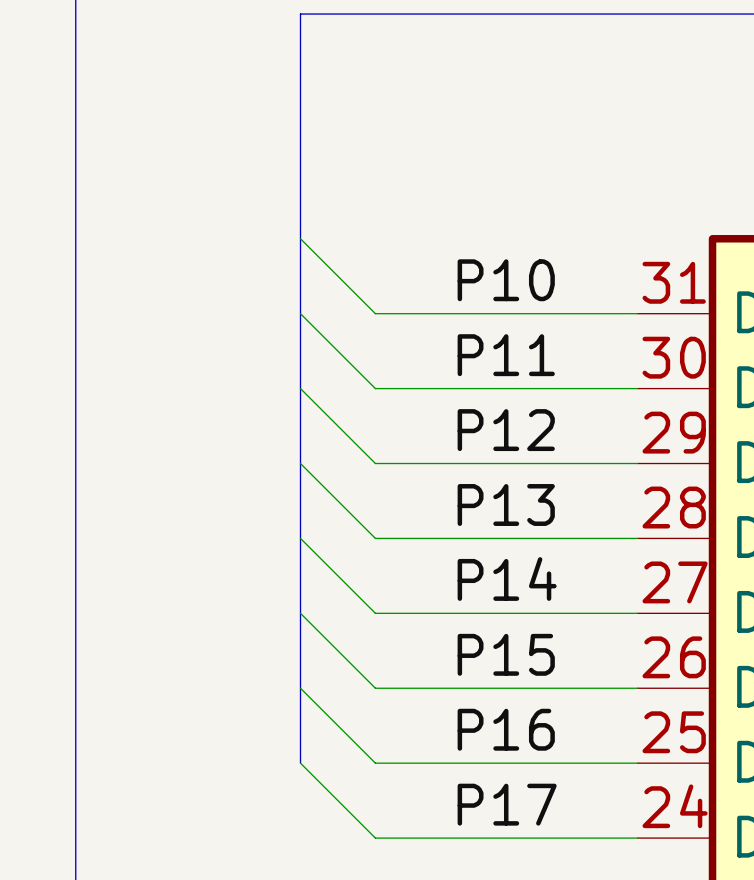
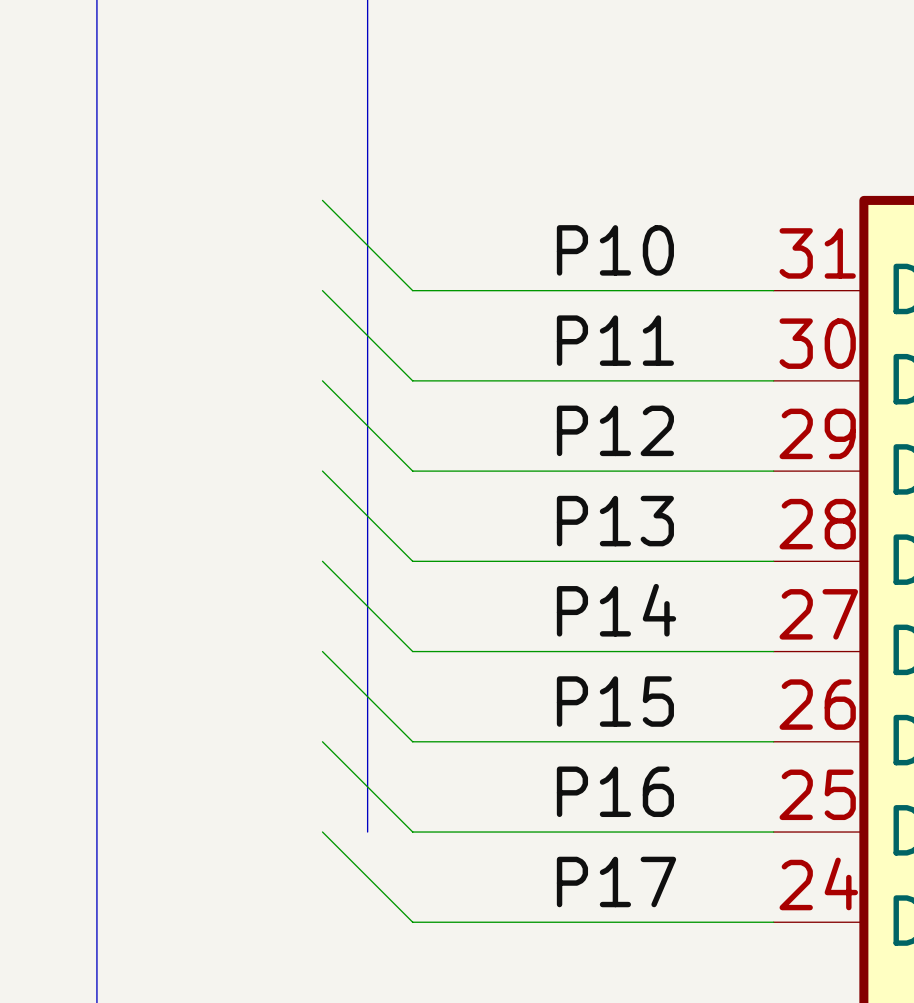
wire: (300, 238) (375, 313) -> (322, 200) (412, 290) (457, 290)
wire: (300, 313) (375, 388) -> (322, 290) (412, 380) (457, 380)
wire: (300, 388) (375, 463) -> (322, 380) (412, 471) (457, 471)
wire: (300, 463) (375, 538) -> (322, 471) (412, 561) (457, 561)
wire: (300, 538) (375, 613) -> (322, 561) (412, 651) (457, 651)
wire: (300, 613) (375, 688) -> (322, 651) (412, 741) (457, 741)
wire: (300, 688) (375, 763) -> (322, 741) (412, 832) (457, 832)
wire: (300, 763) (375, 838) -> (322, 832) (412, 922) (457, 922)

